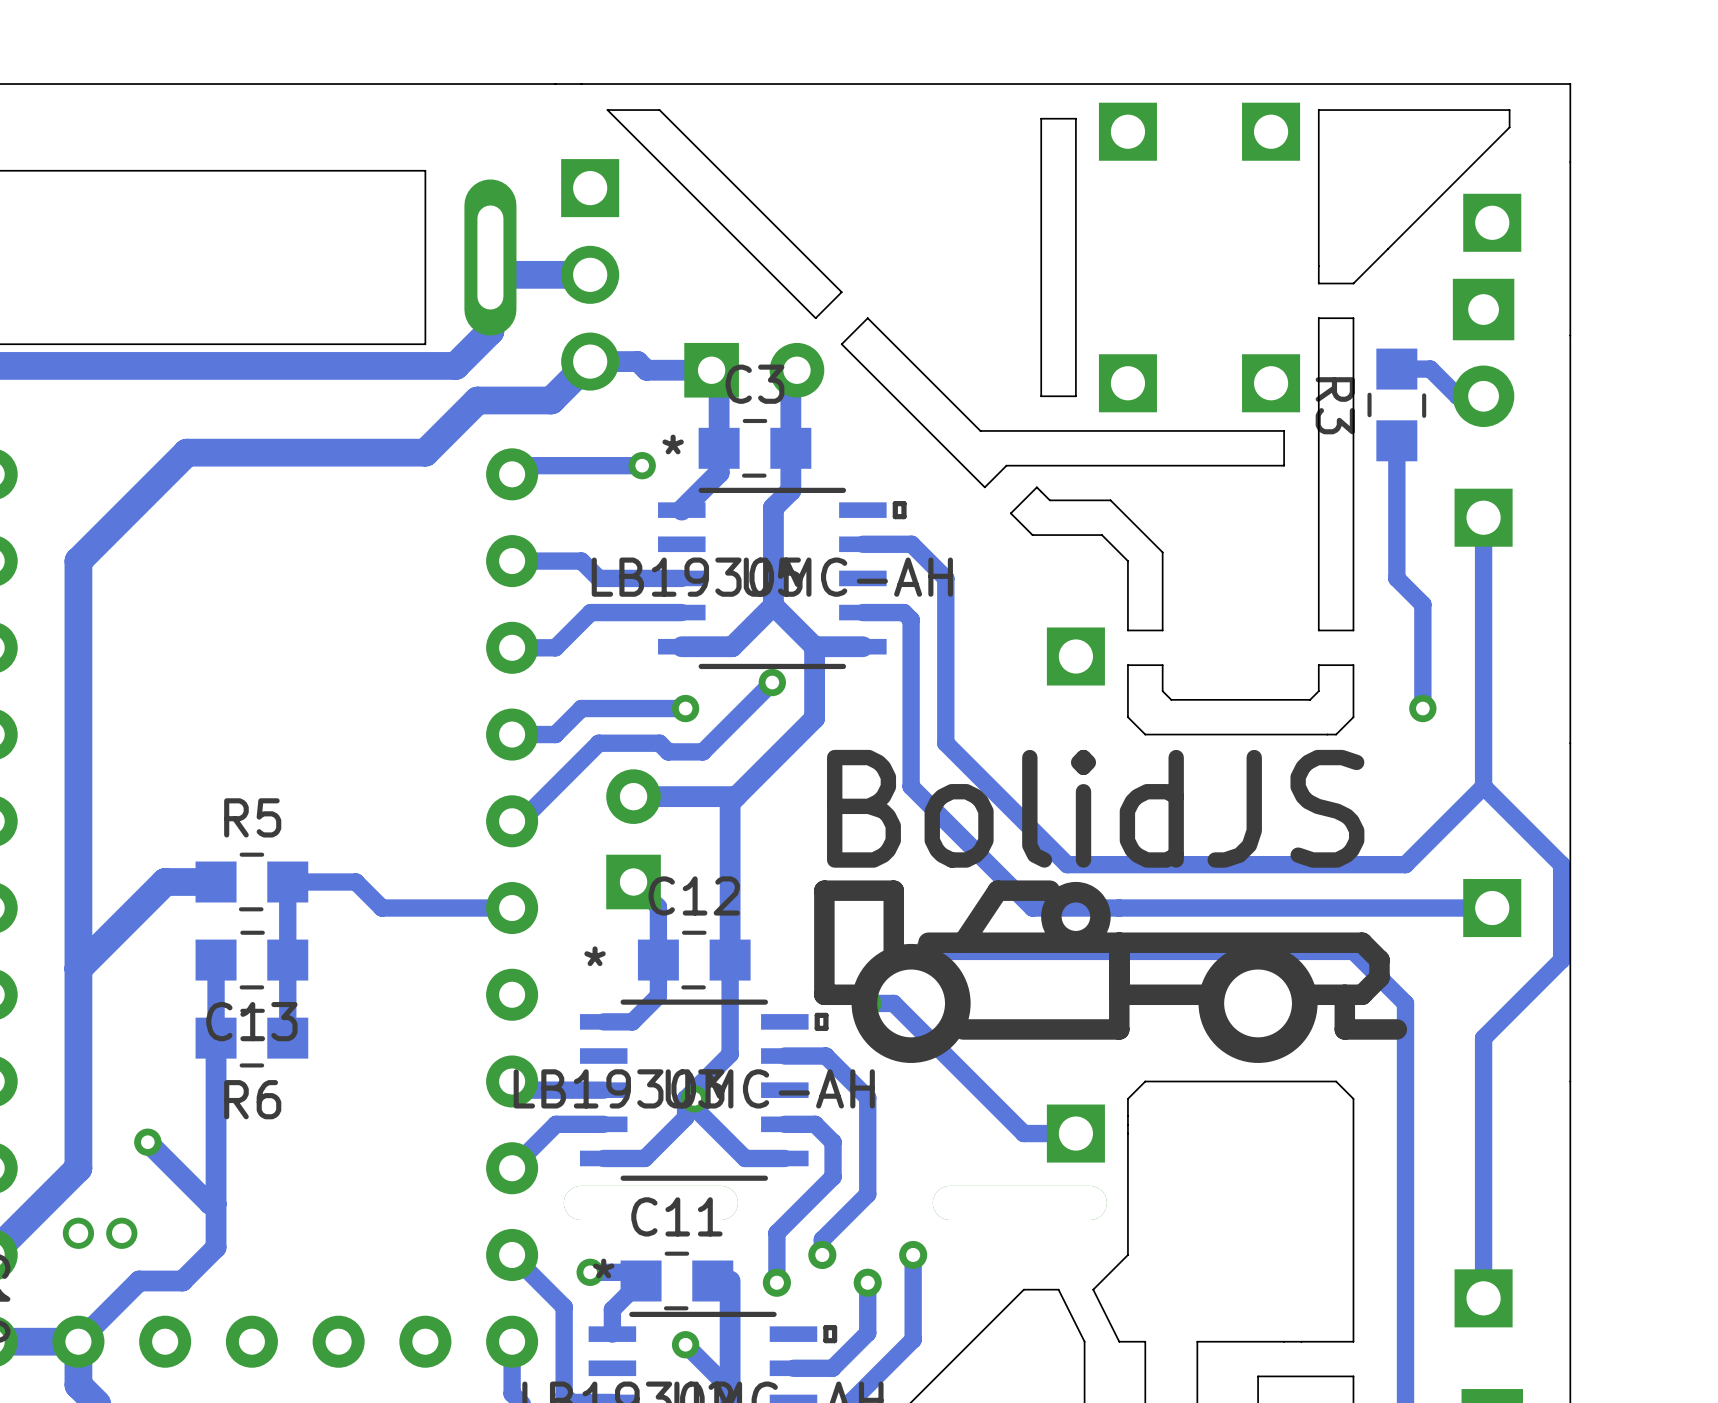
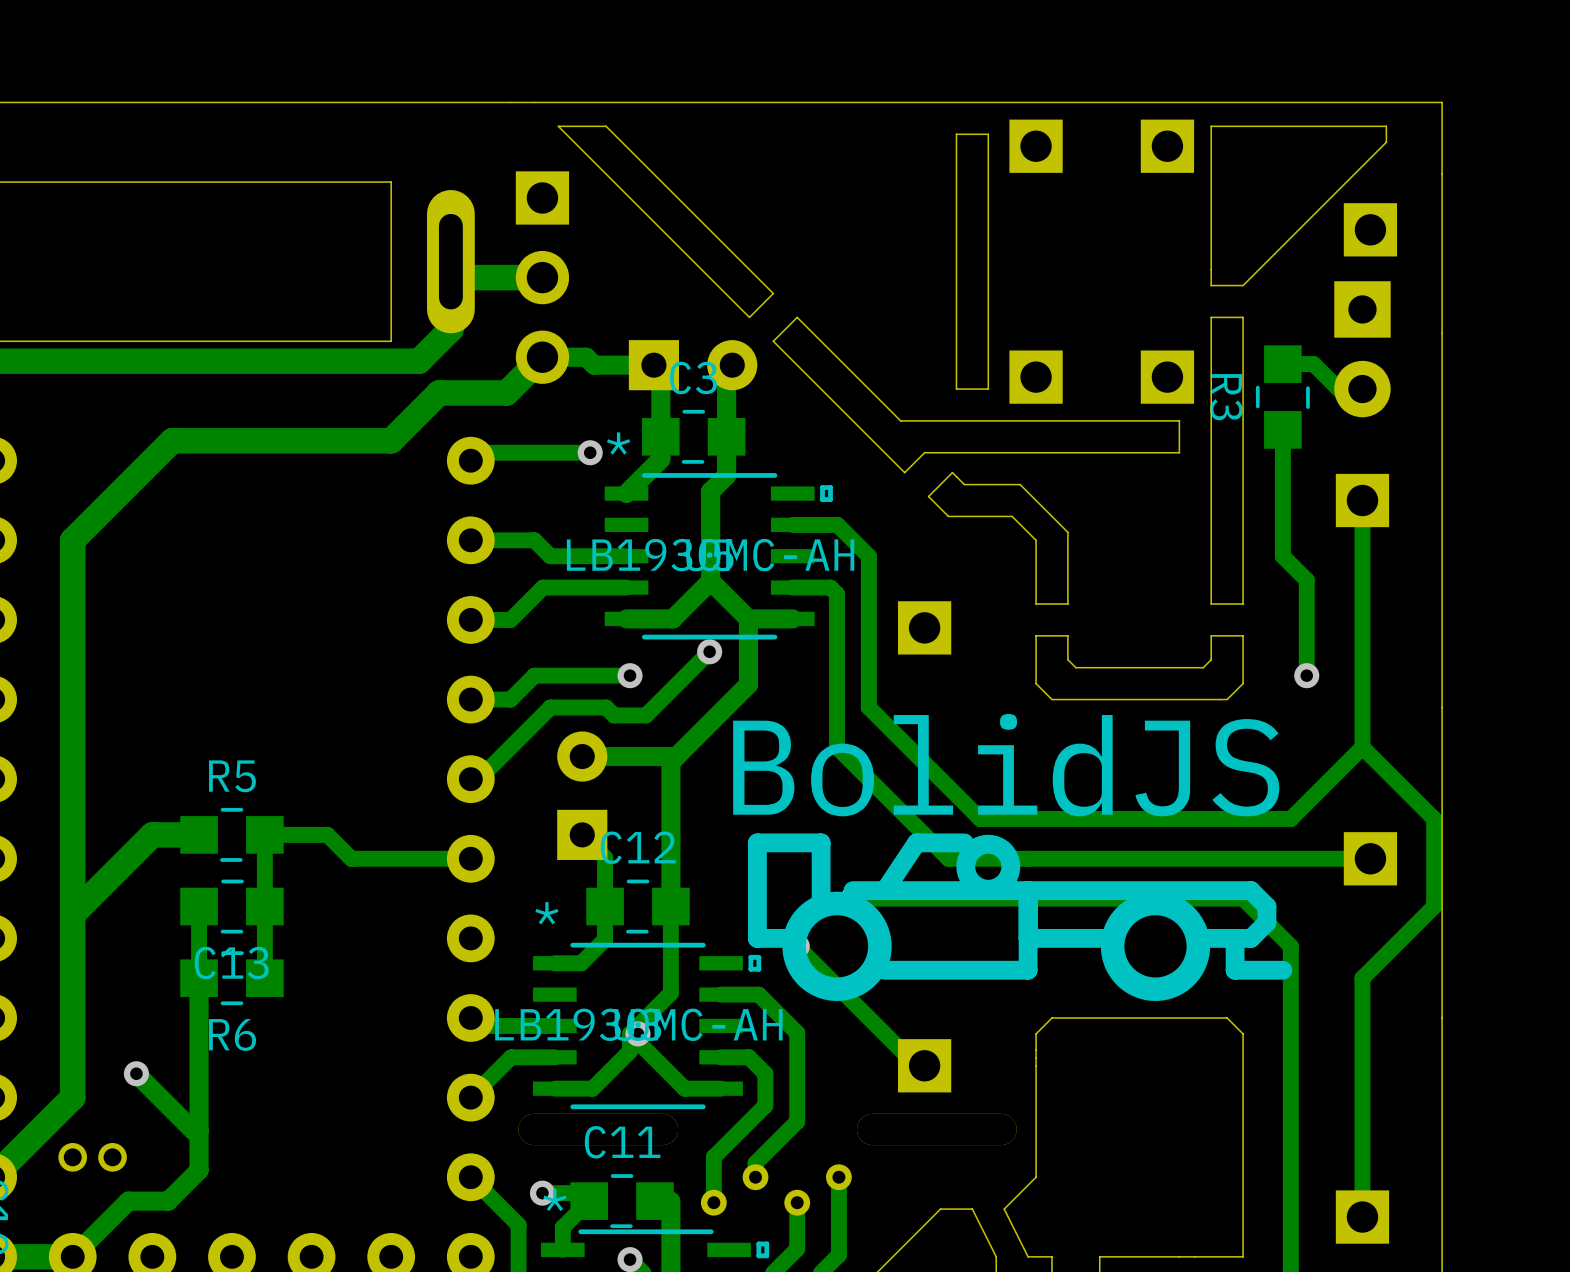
part position: (1075, 656) -> (924, 627)
track: (867, 1003) (893, 1003) (1023, 1133) (1075, 1133) -> (797, 946) (916, 1065) (924, 1065)
part position: (1075, 1133) -> (924, 1065)

